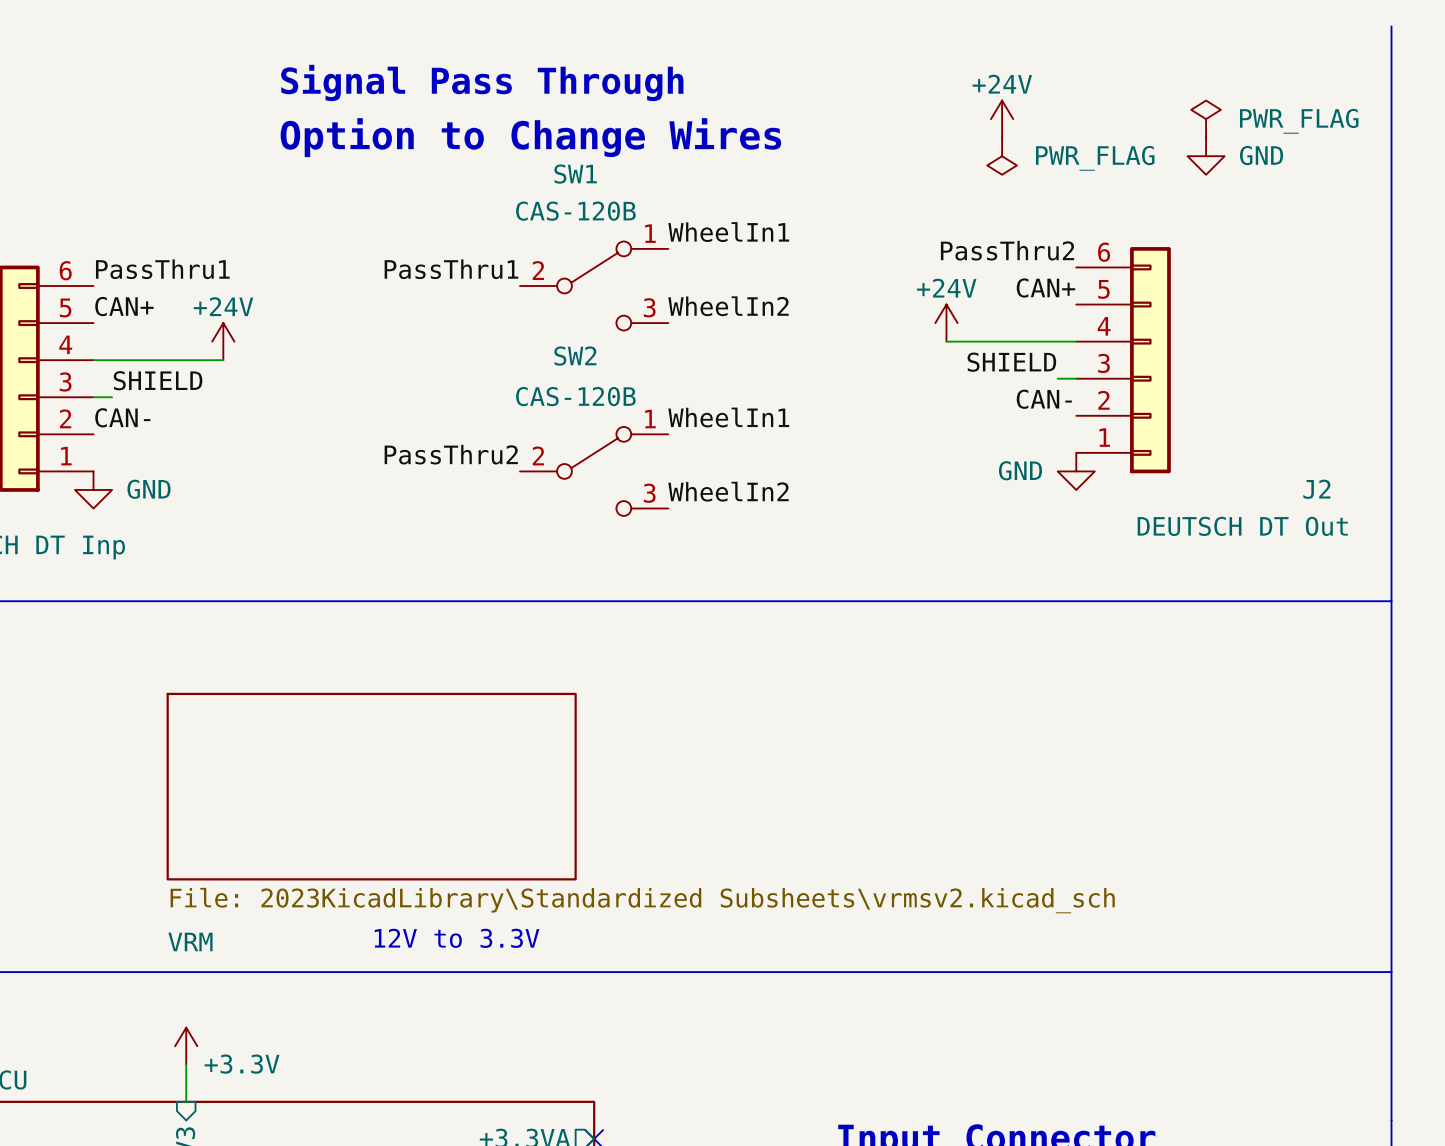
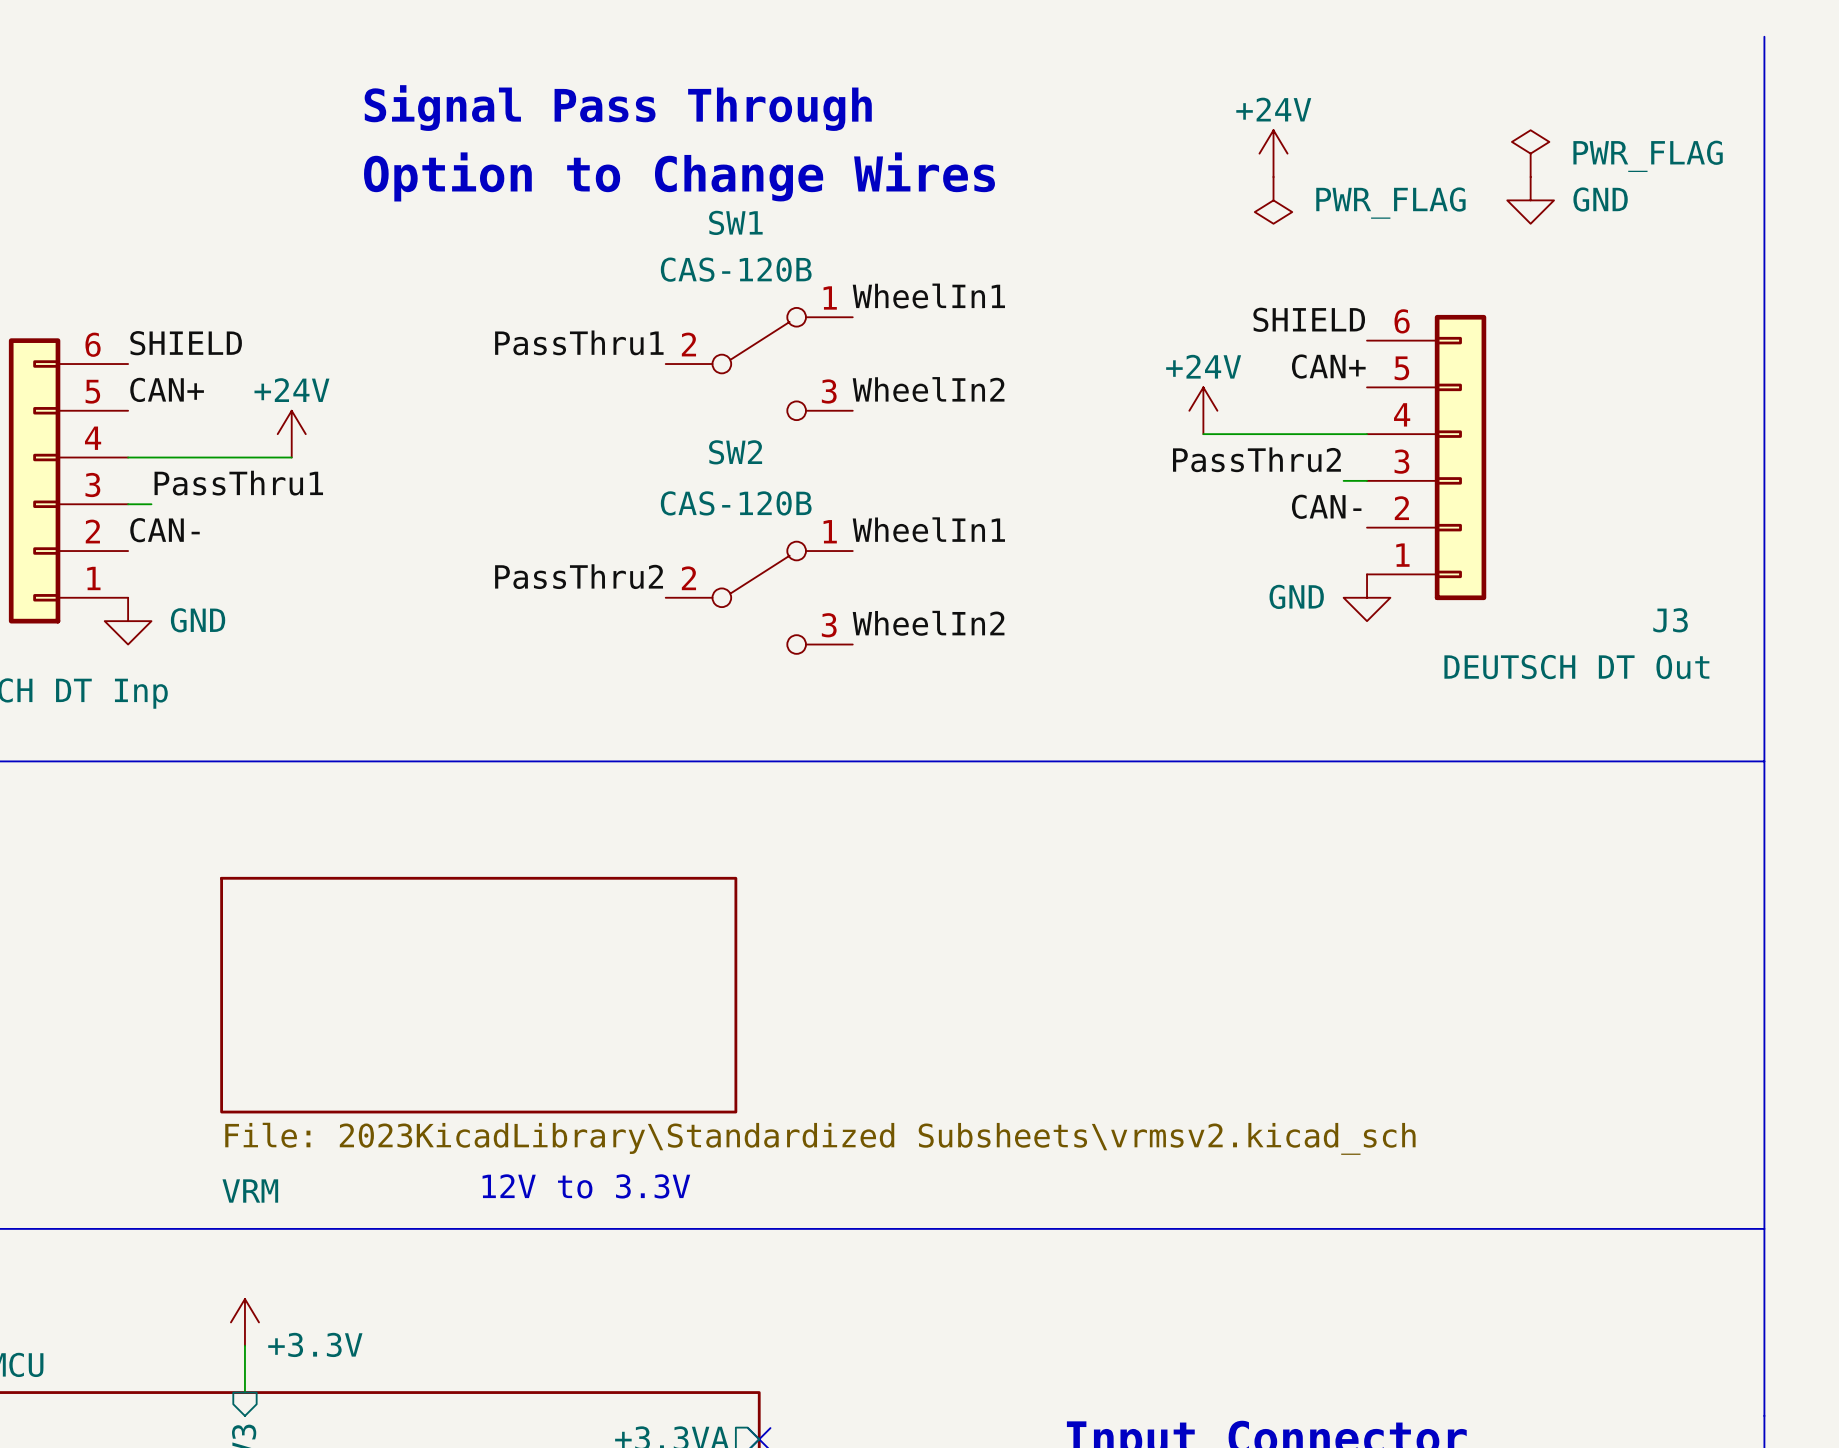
label: PassThru2 (1007, 250) -> SHIELD (1309, 319)
label: PassThru1 (162, 269) -> SHIELD (186, 343)
label: SHIELD (1011, 362) -> PassThru2 (1256, 459)
label: SHIELD (158, 380) -> PassThru1 (238, 483)
J2 name: J2 (1316, 489) -> J3 (1670, 620)

